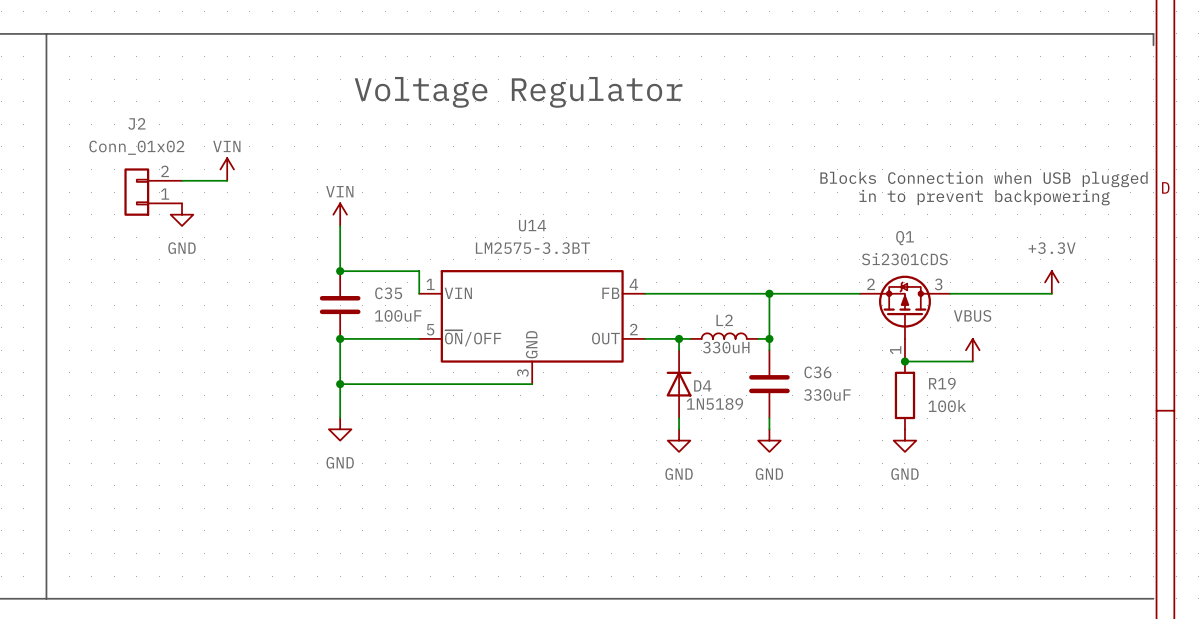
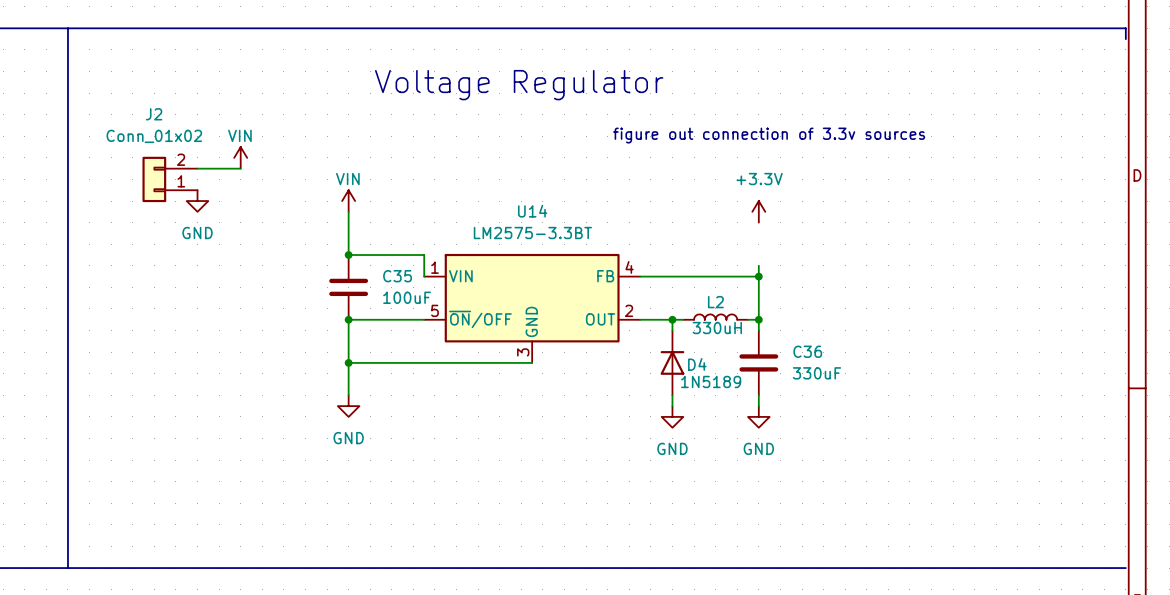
text: none -> figure out connection of 3.3v sources (769, 135)
text: Blocks Connection when USB plugged (984, 179) -> none
text: in to prevent backpowering (984, 197) -> none
power symbol: none -> +3.3V (758, 211)
power symbol: +3.3V (1051, 282) -> none
wire: (769, 293) (859, 293) -> (758, 276) (758, 265)
wire: (950, 293) (1051, 293) -> none
Q1: Si2301CDS (904, 318) -> none
power symbol: VBUS (972, 350) -> none
wire: (904, 361) (972, 361) -> none
junction: (904, 361) -> none
R19: 100k (904, 395) -> none
power symbol: GND (904, 440) -> none

